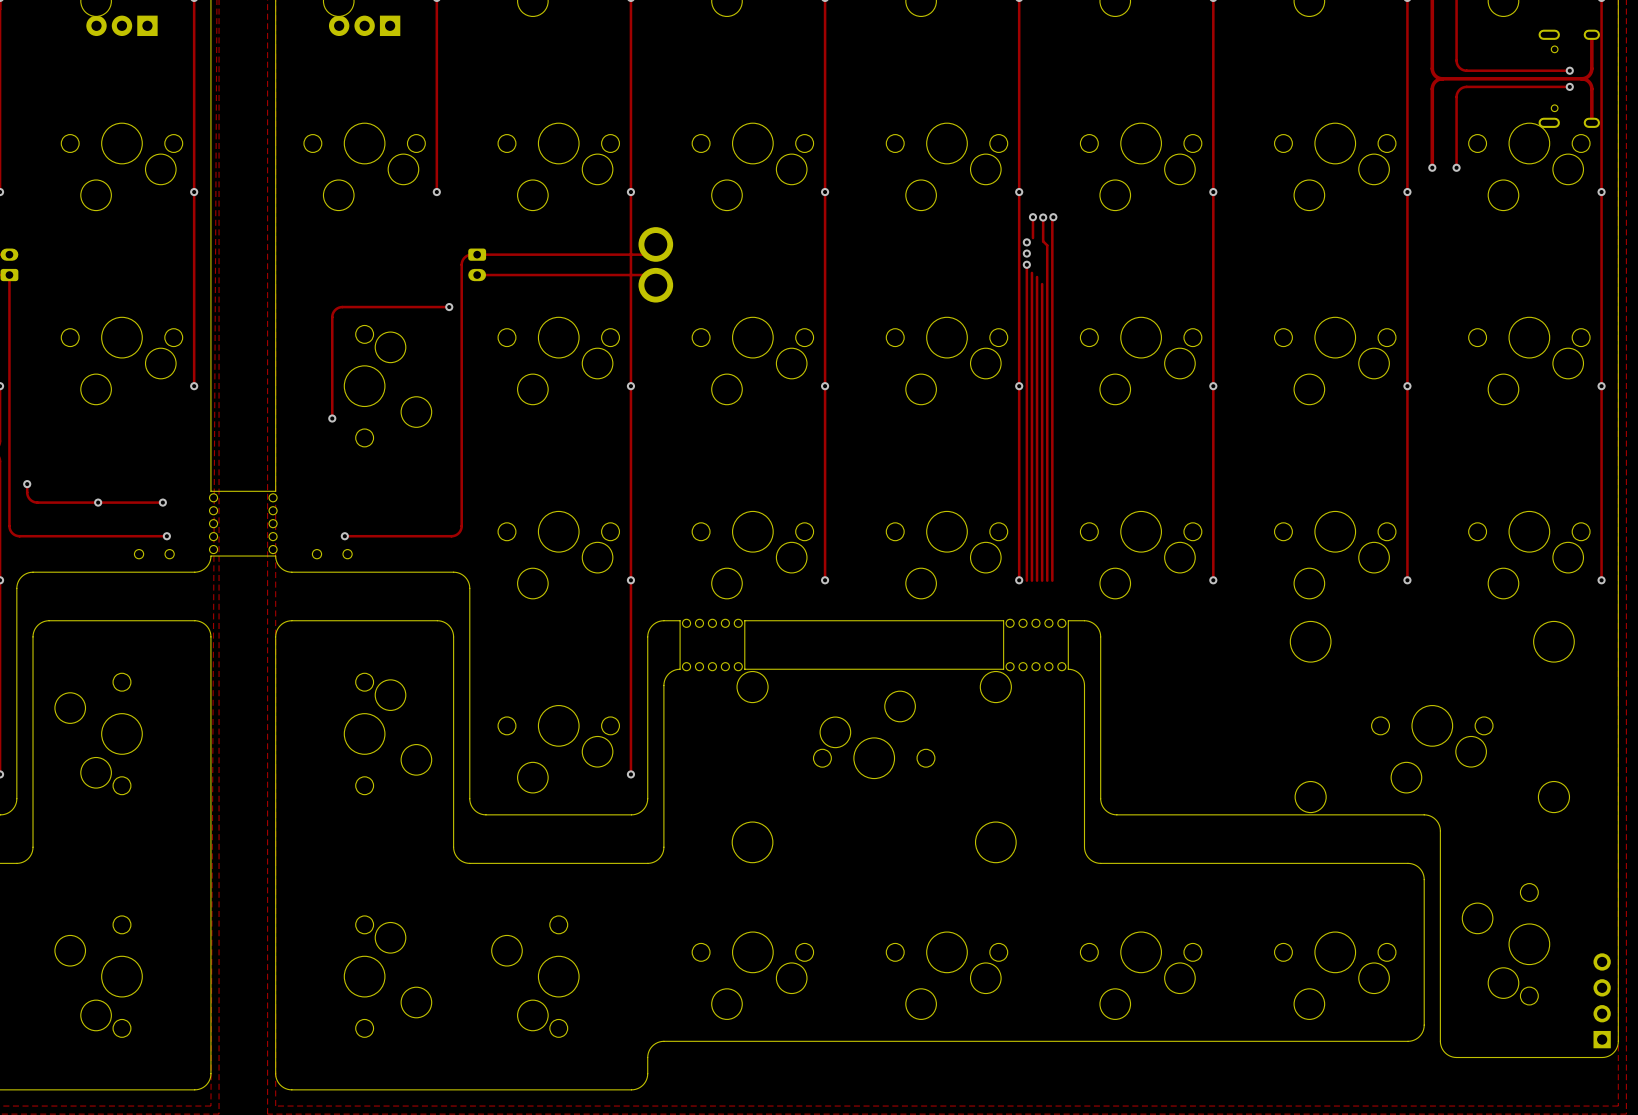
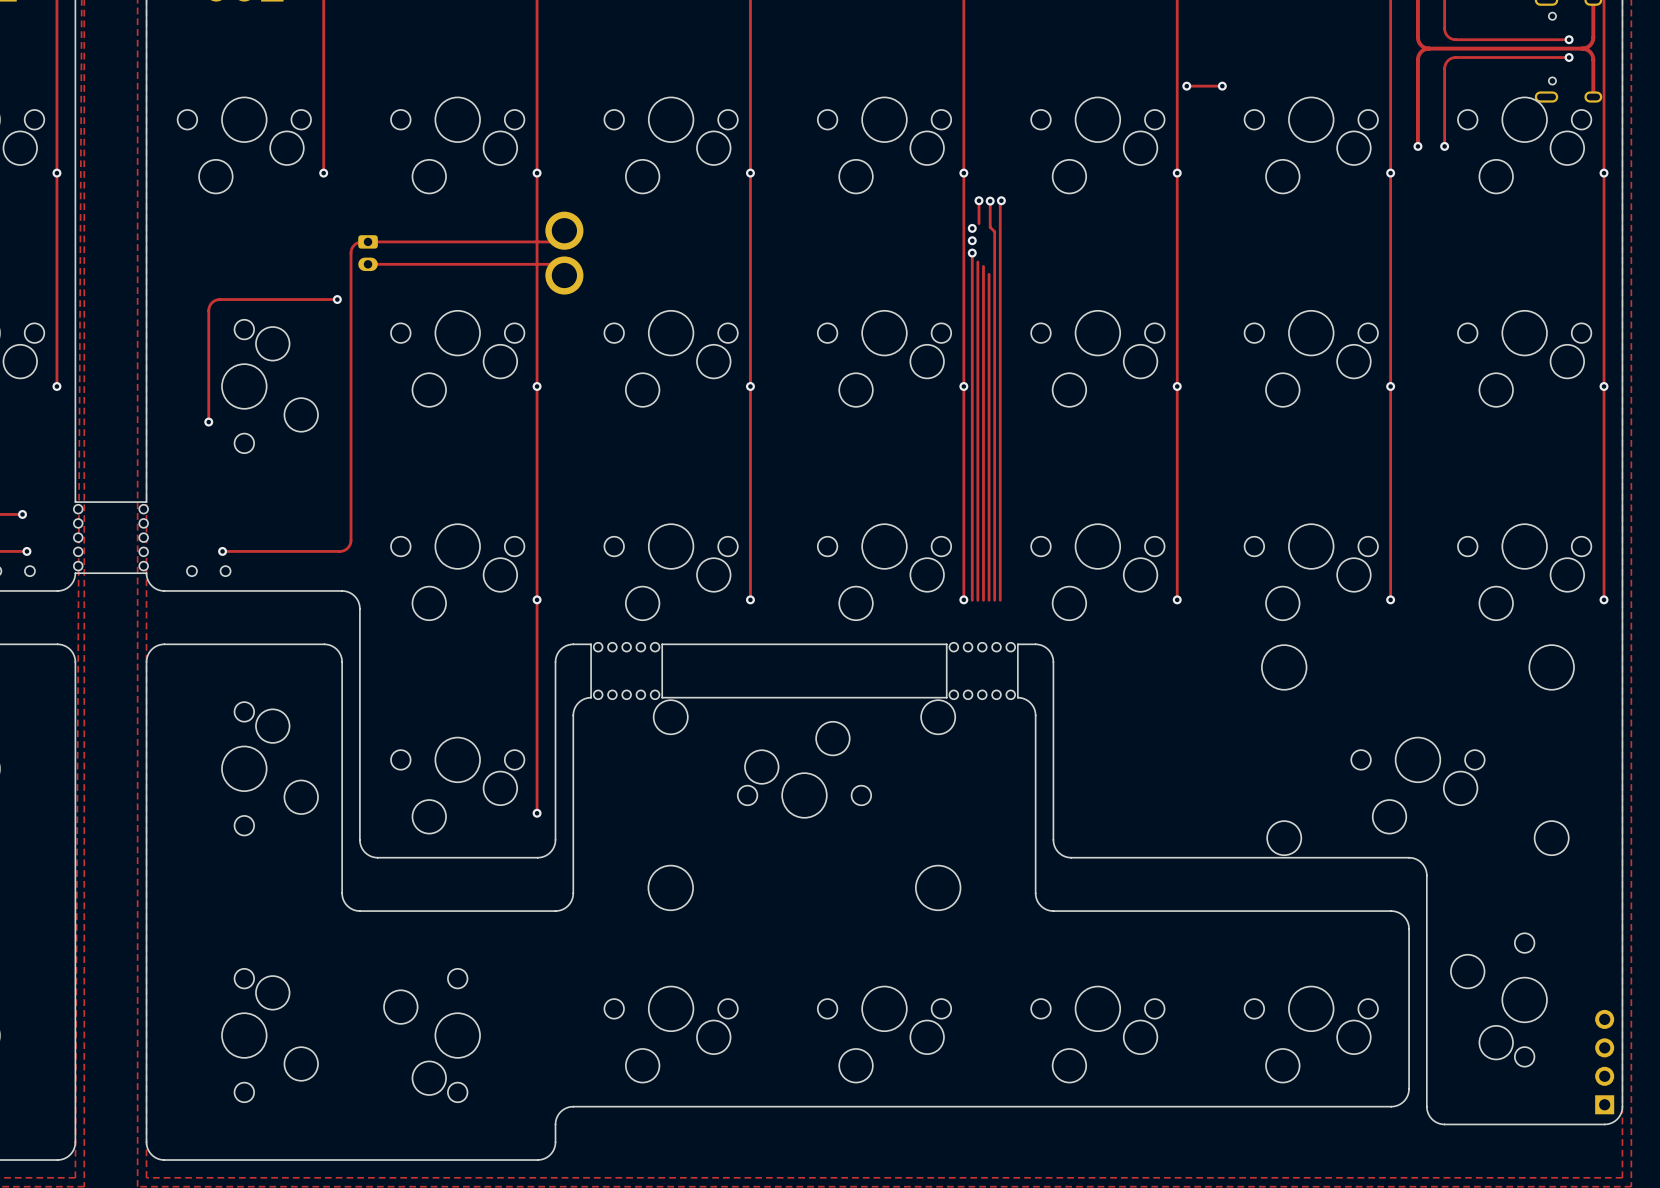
track: none -> (1186, 86) (1222, 86)
via: none -> (1186, 86)
via: none -> (1222, 86)

